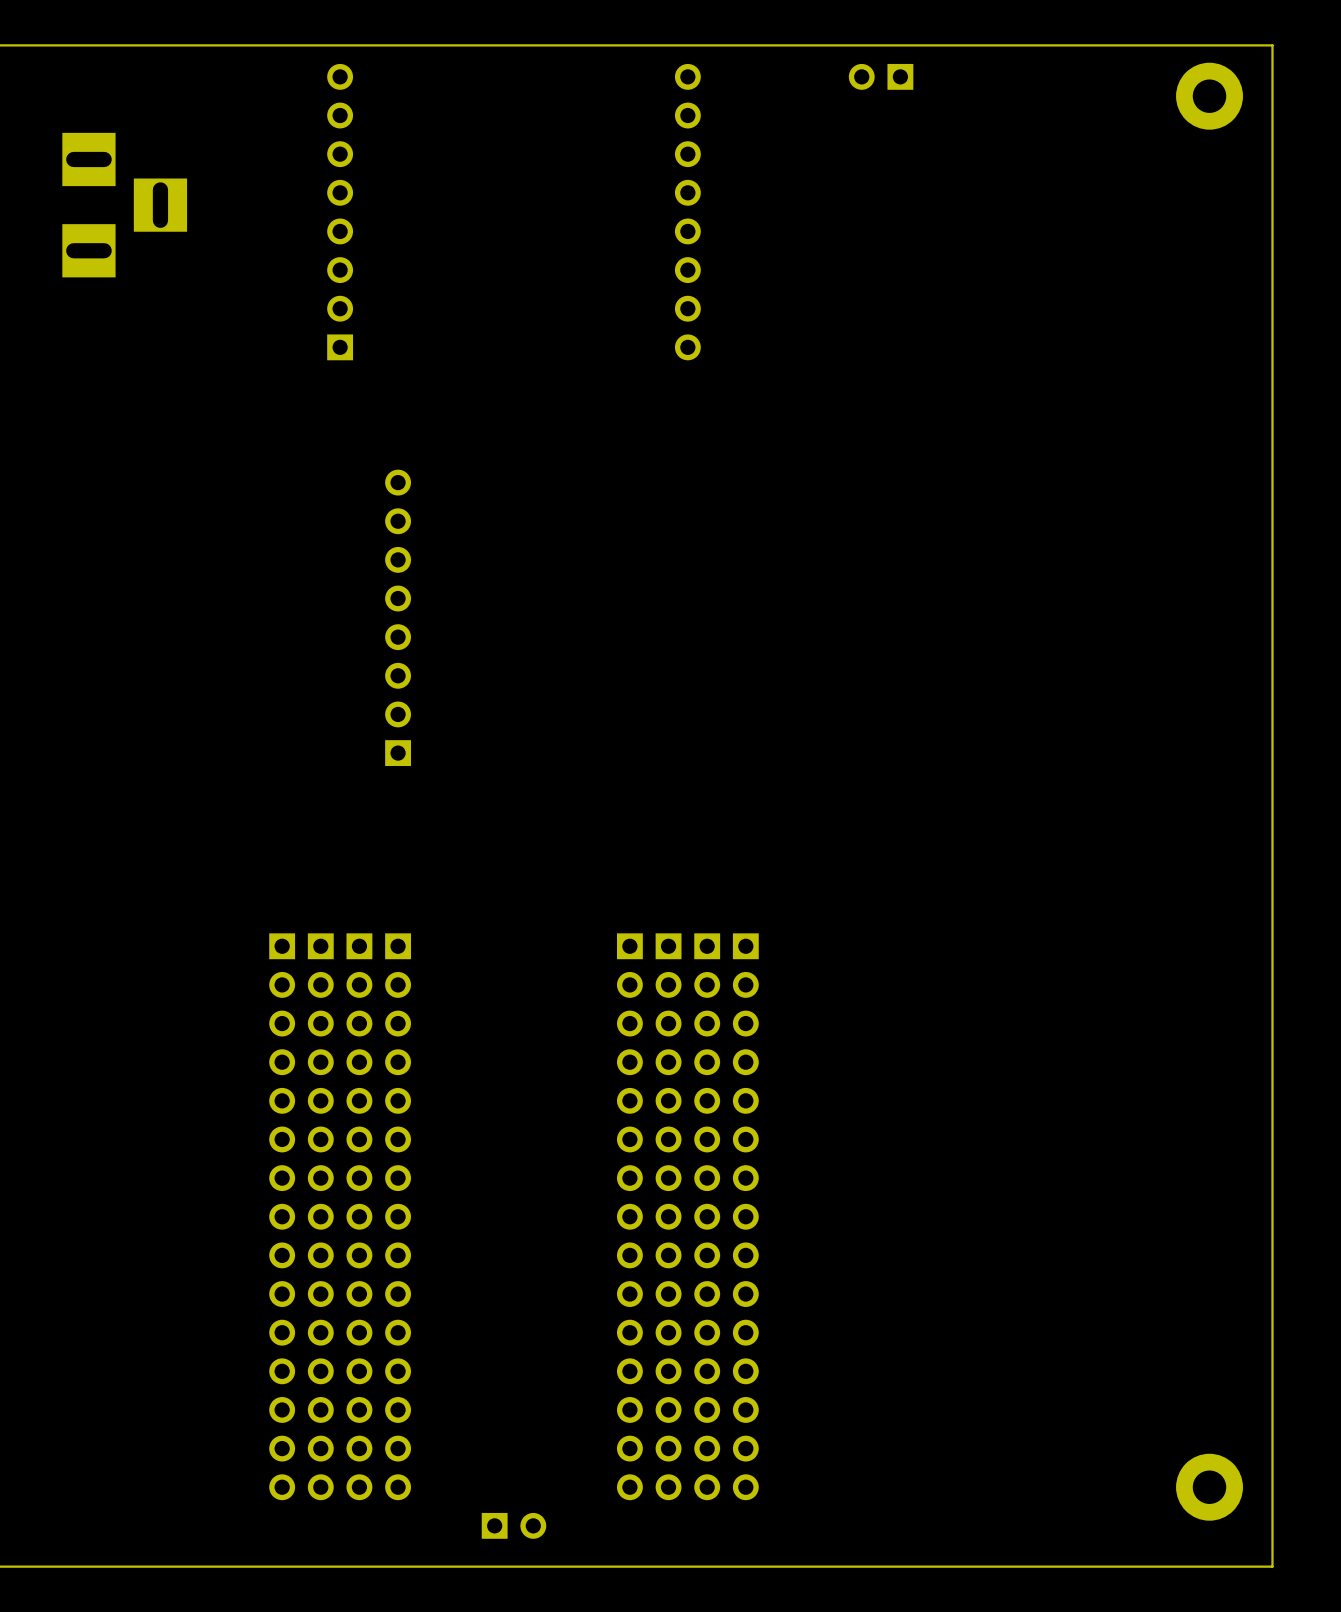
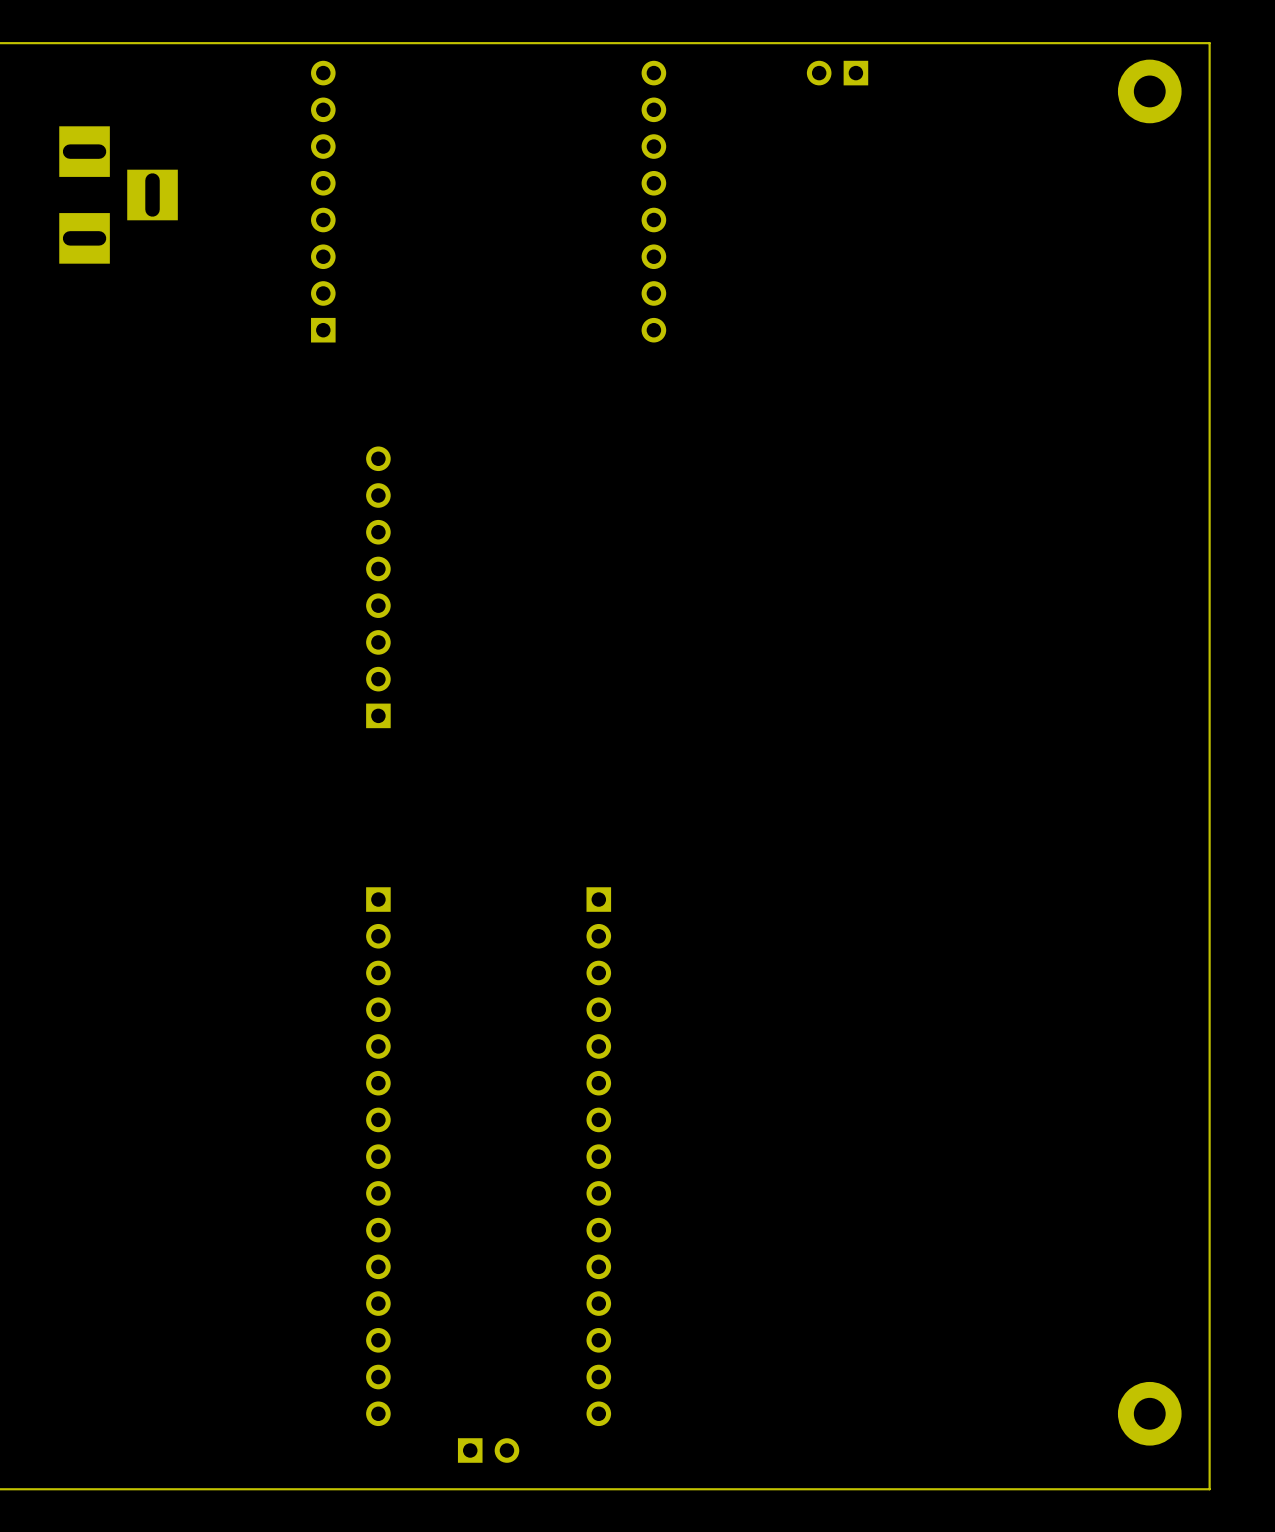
part: (282, 1216) -> none
part: (320, 1216) -> none
part: (359, 1216) -> none
part: (668, 1216) -> none
part: (707, 1216) -> none
part: (745, 1216) -> none

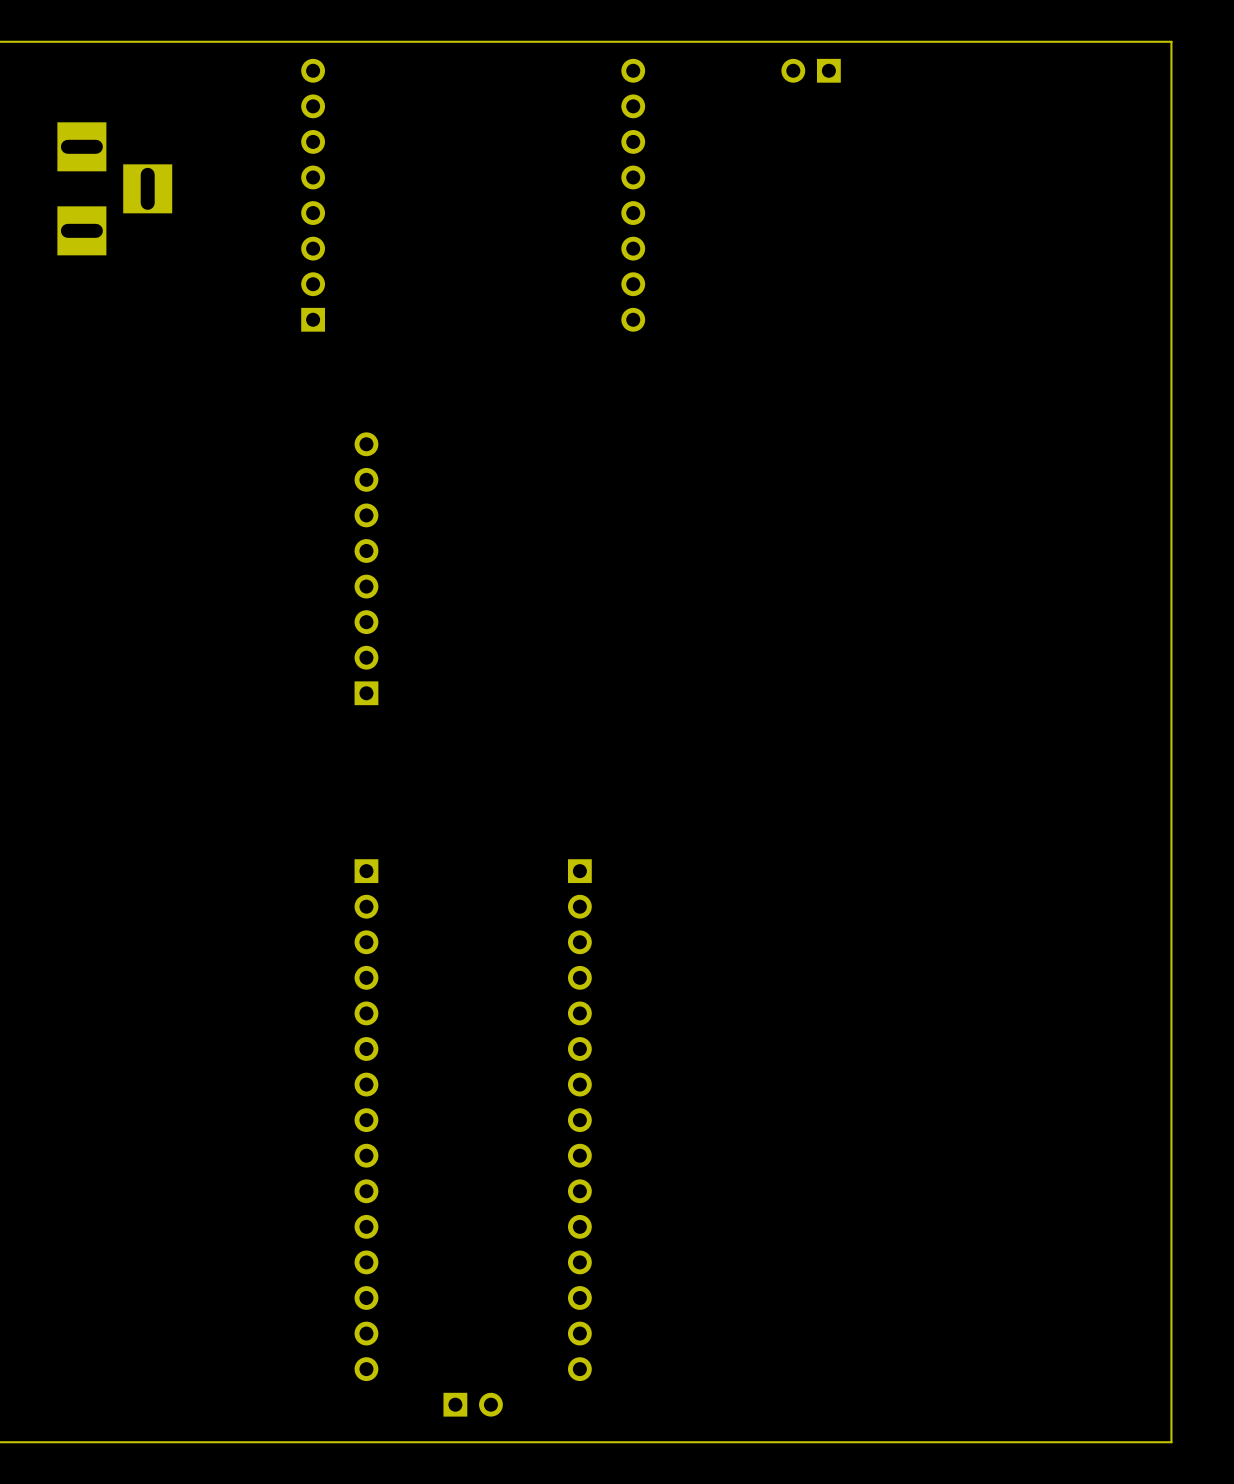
part: (1149, 91) -> none
part: (1149, 1413) -> none

